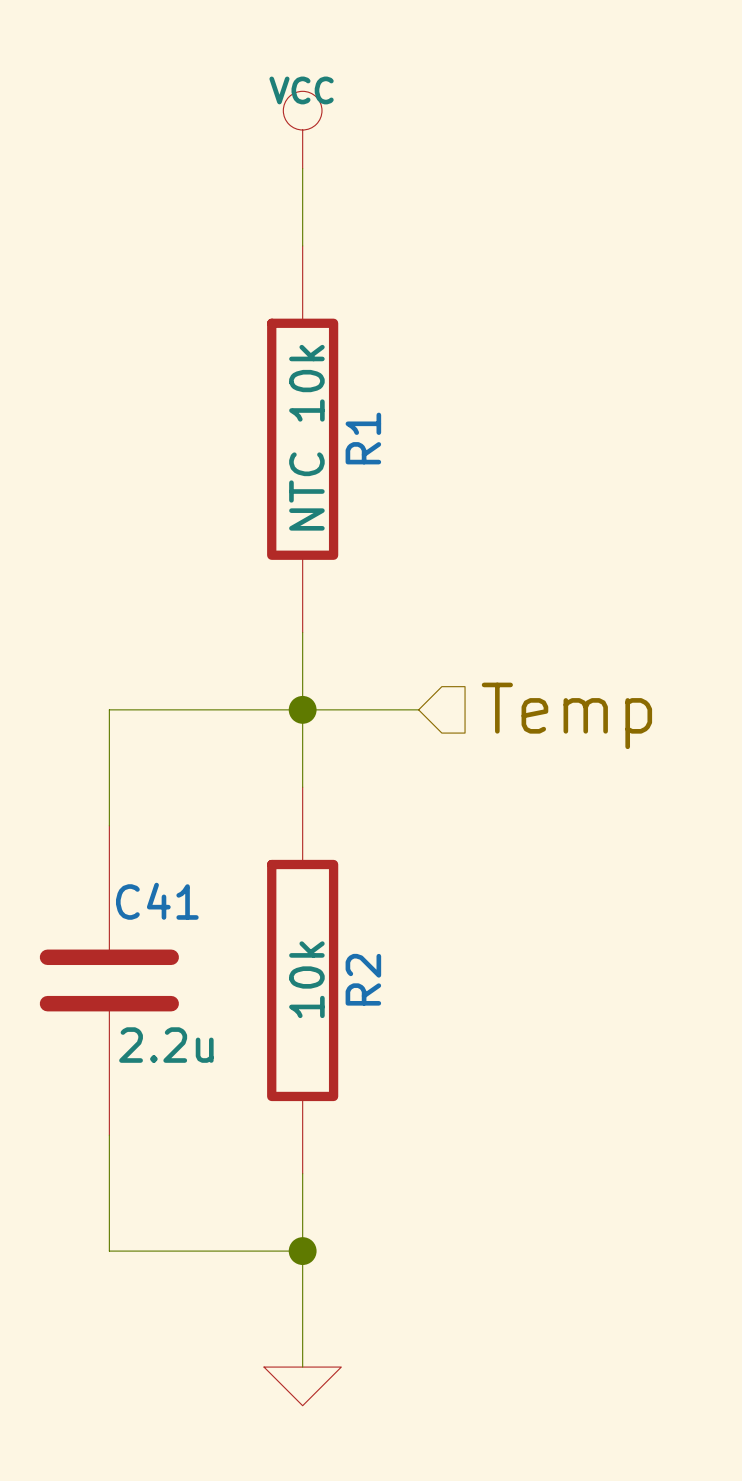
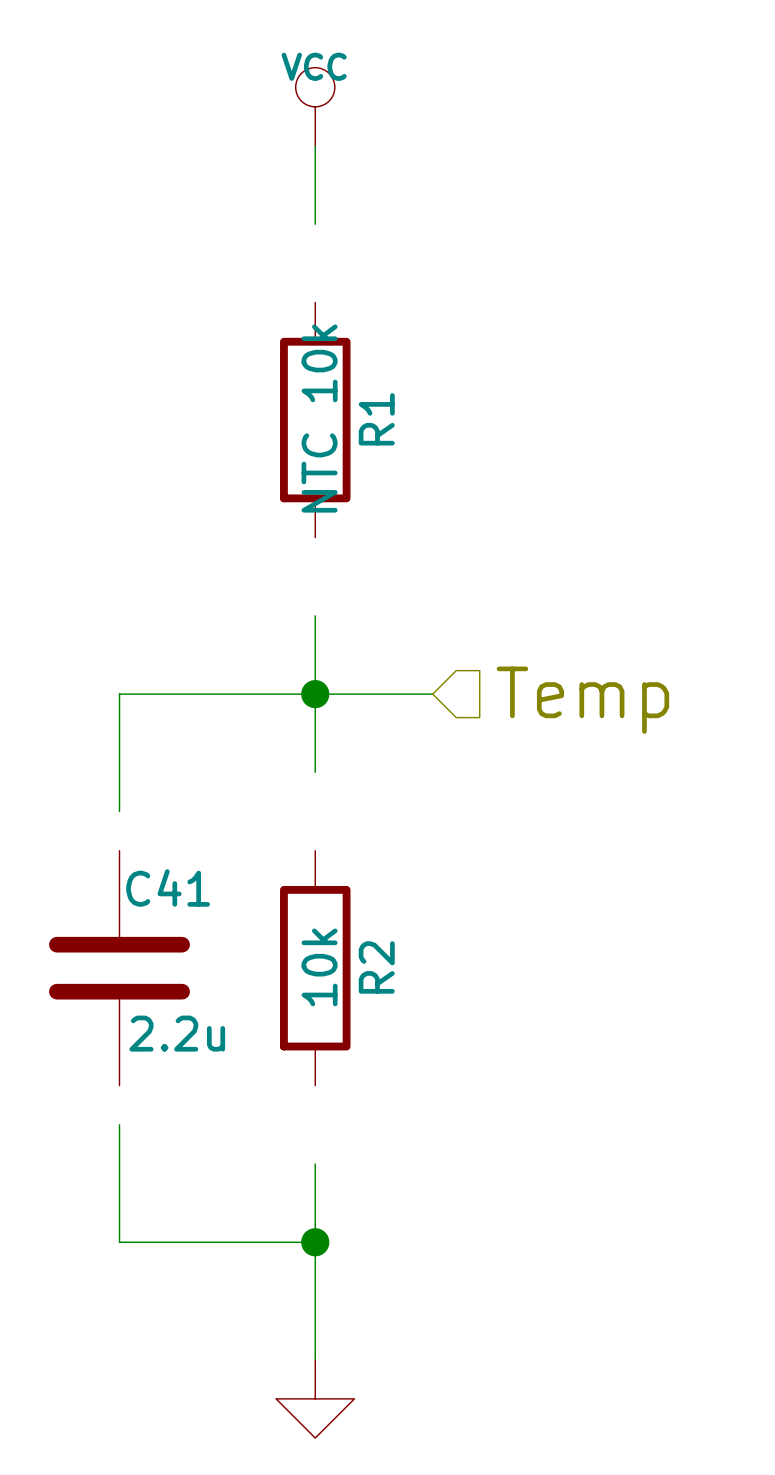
R1 symbol: [267, 245, 339, 633] -> [280, 302, 351, 538]
R2 symbol: [267, 787, 339, 1174] -> [280, 850, 351, 1086]
C41 symbol: [39, 825, 179, 1136] -> [49, 850, 190, 1086]
power symbol shape: [264, 1367, 342, 1406] -> [276, 1359, 355, 1439]

